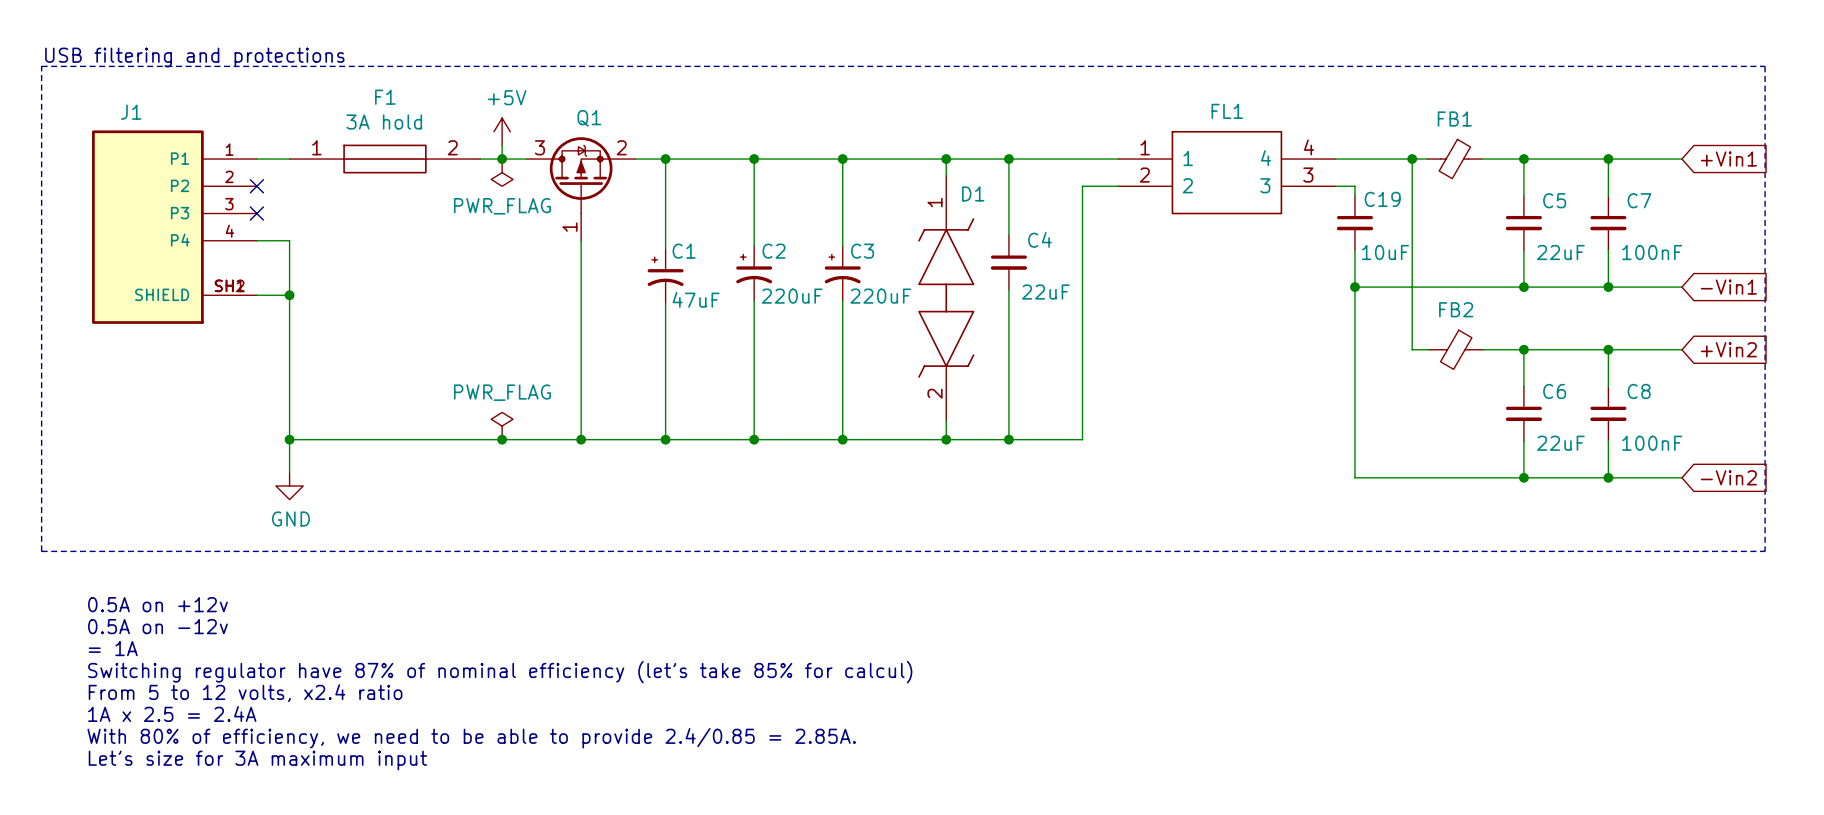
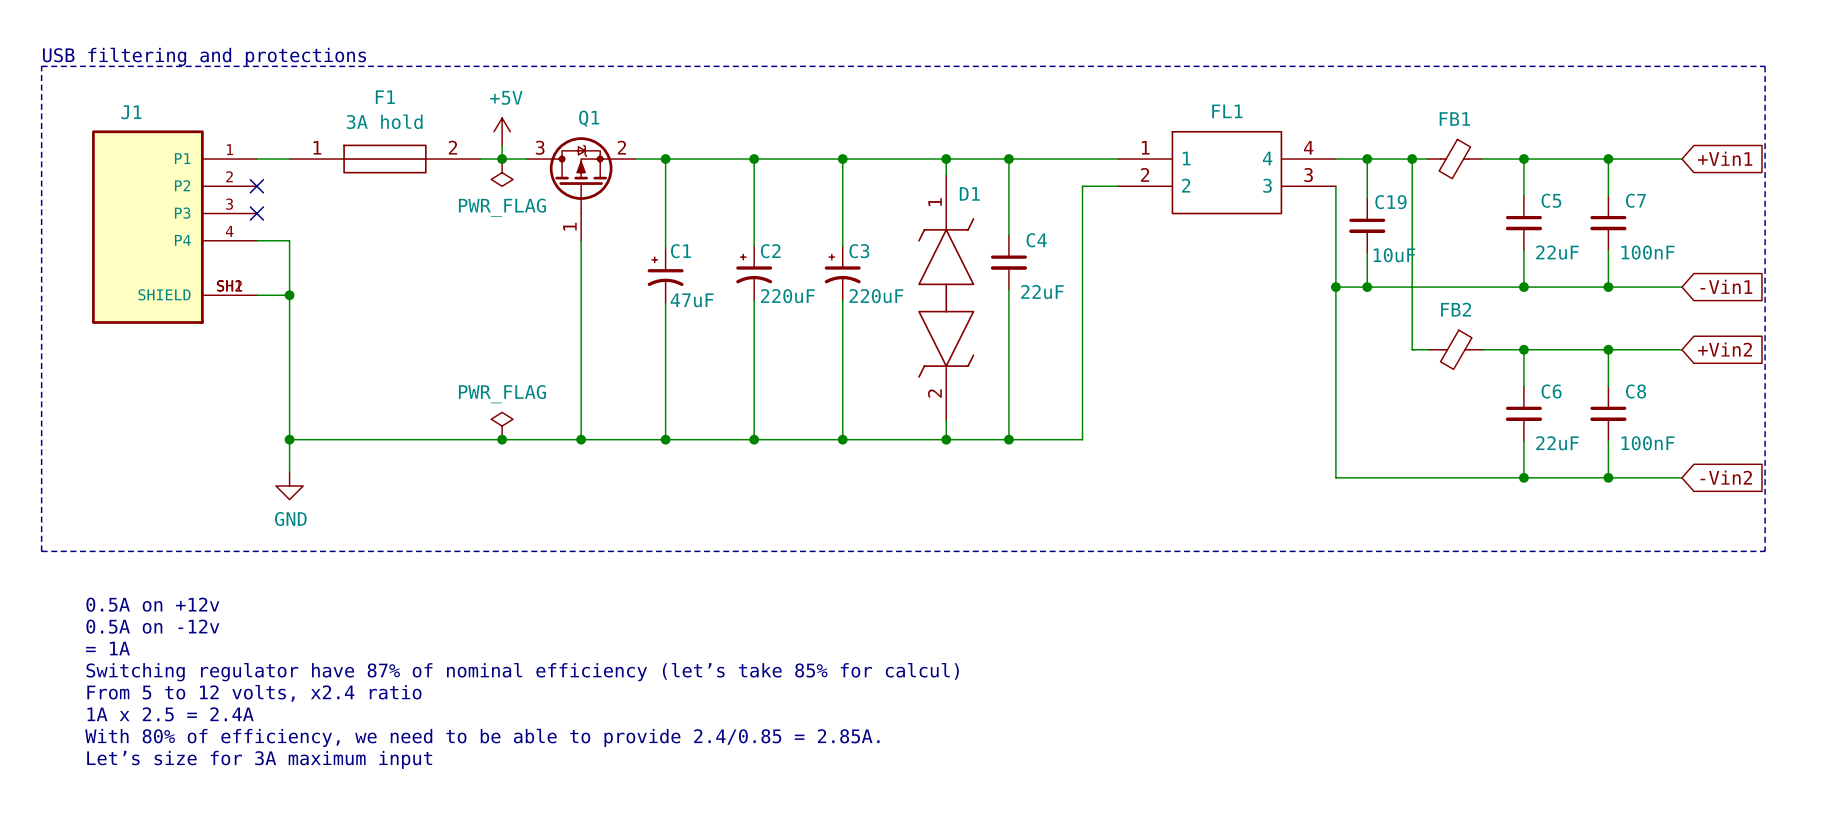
wire: none -> (1367, 159) (1367, 198)
junction: none -> (1367, 159)
wire: (1335, 186) (1354, 186) (1354, 195) -> none
C19 position: (1354, 223) -> (1367, 225)
wire: (1354, 250) (1354, 477) -> (1335, 186) (1335, 477) (1354, 477)
wire: none -> (1367, 253) (1367, 287)
wire: none -> (1335, 287) (1354, 287)
junction: none -> (1335, 287)
junction: (1354, 287) -> none
junction: none -> (1367, 287)

